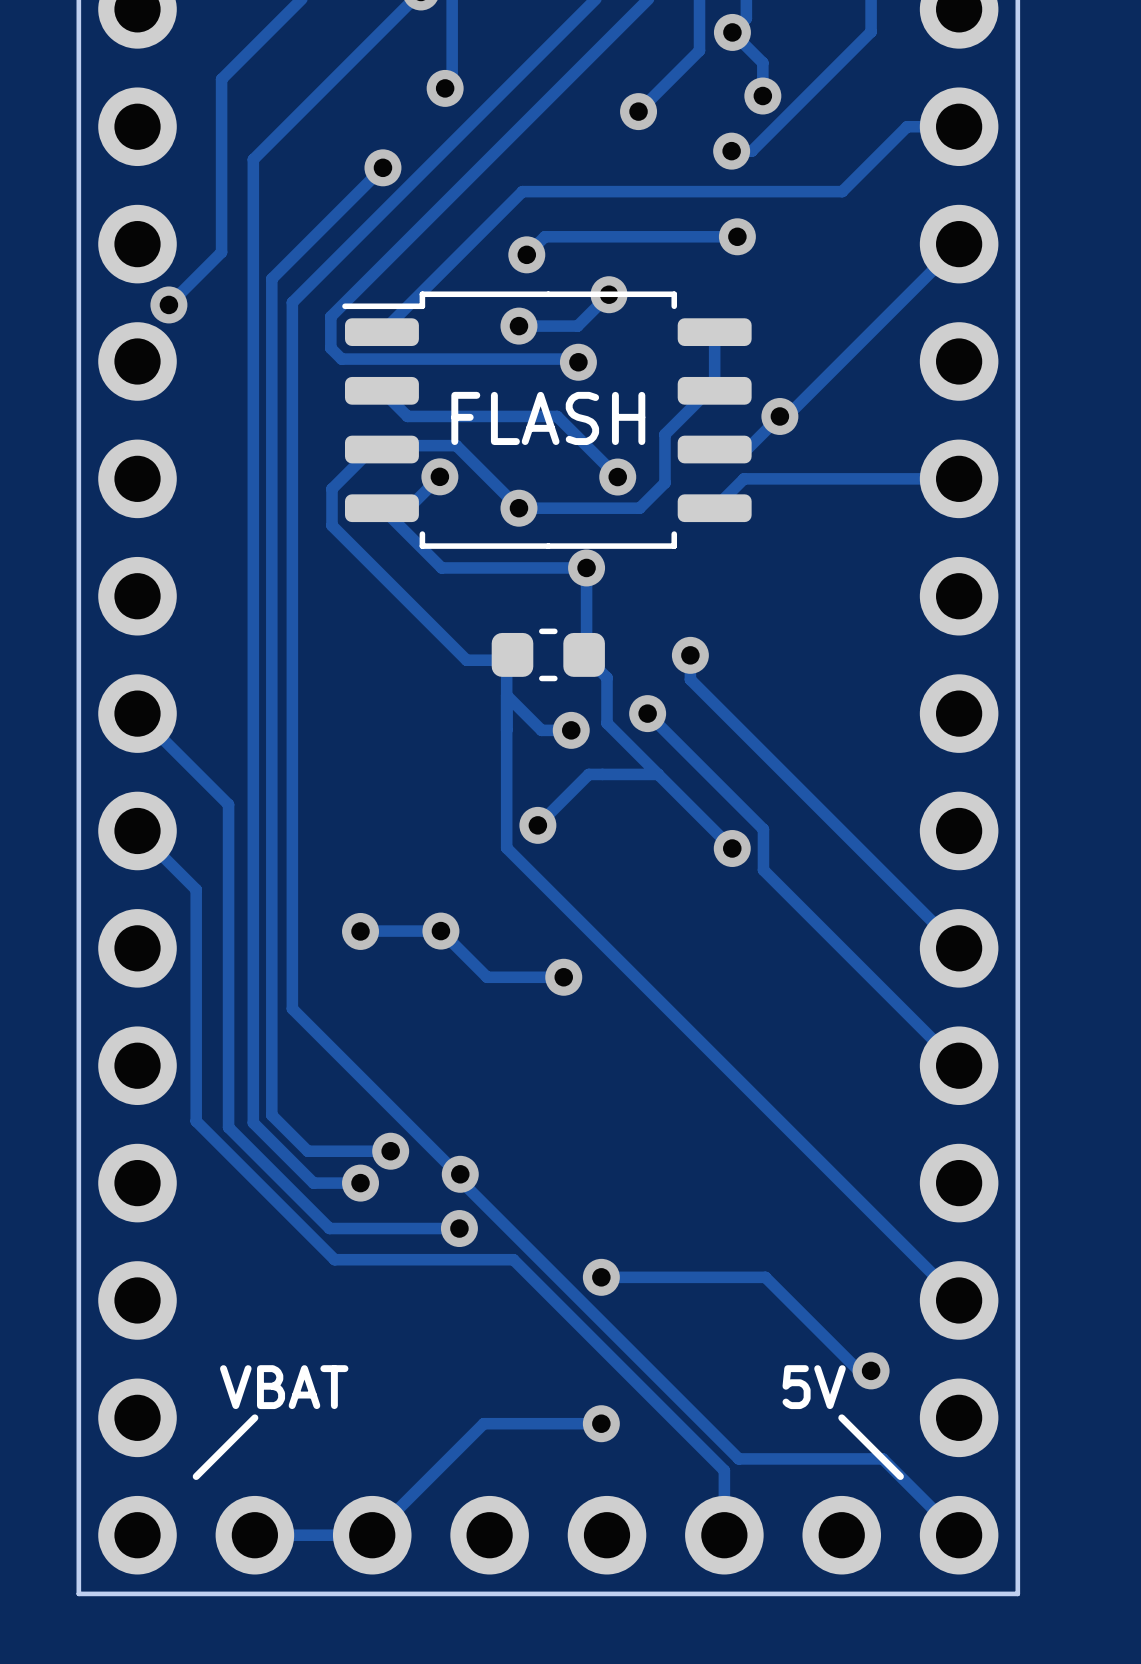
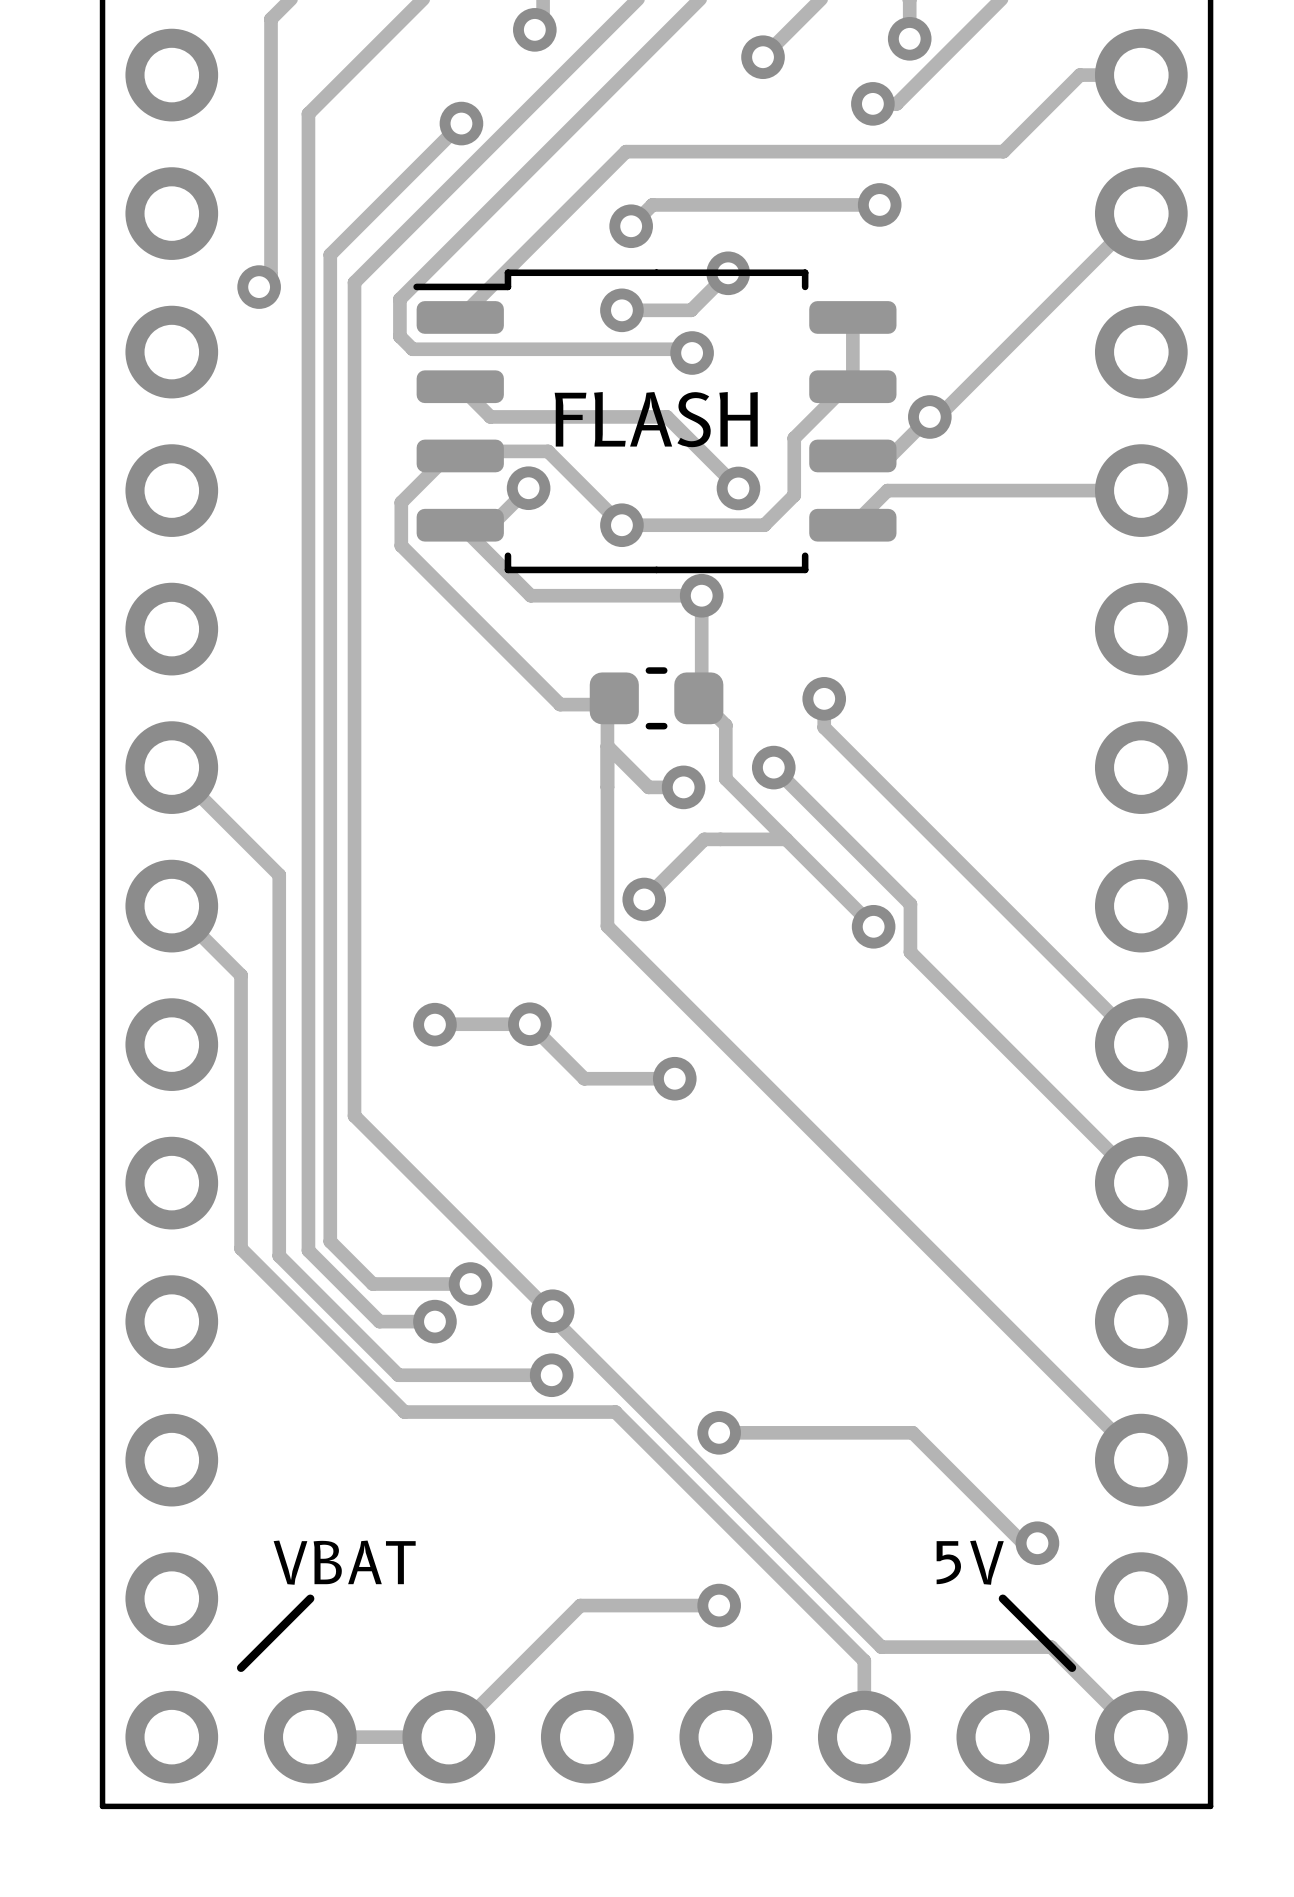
track: (221, 252) (168, 304) -> (271, 223) (271, 275) (259, 287)
via position: (168, 304) -> (259, 287)

